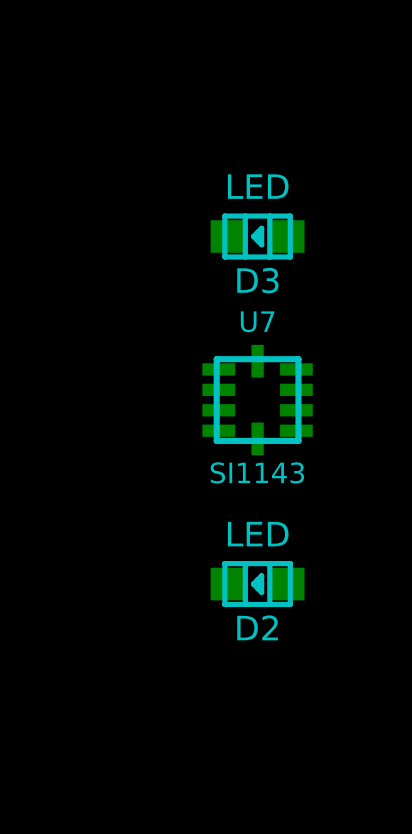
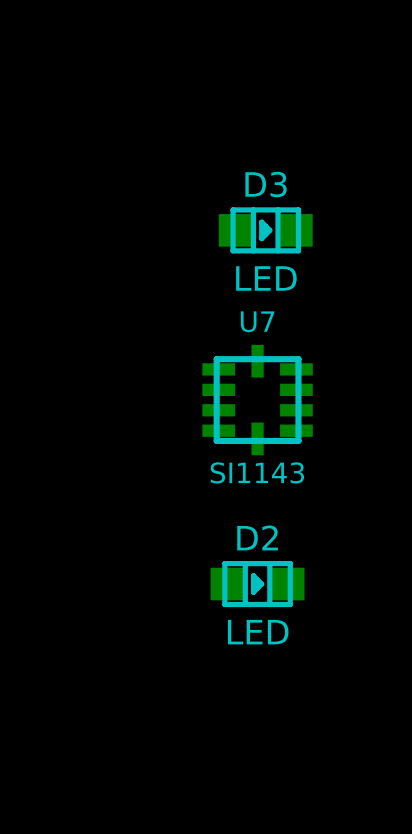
D3 rotation: 0° (257, 236) -> 180° (265, 230)
D2 rotation: 0° (257, 584) -> 180° (257, 584)

